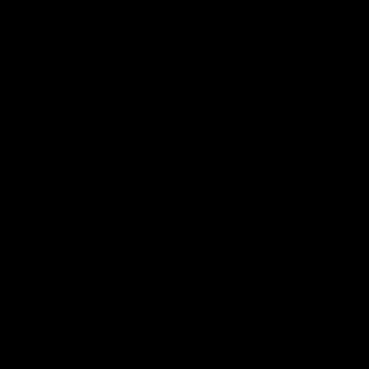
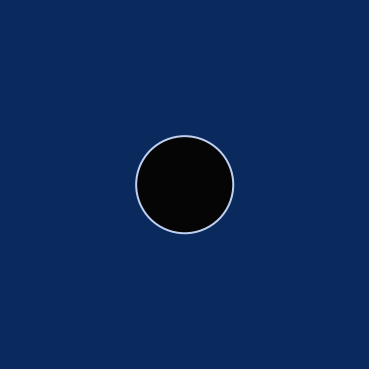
part: none -> (184, 184)

